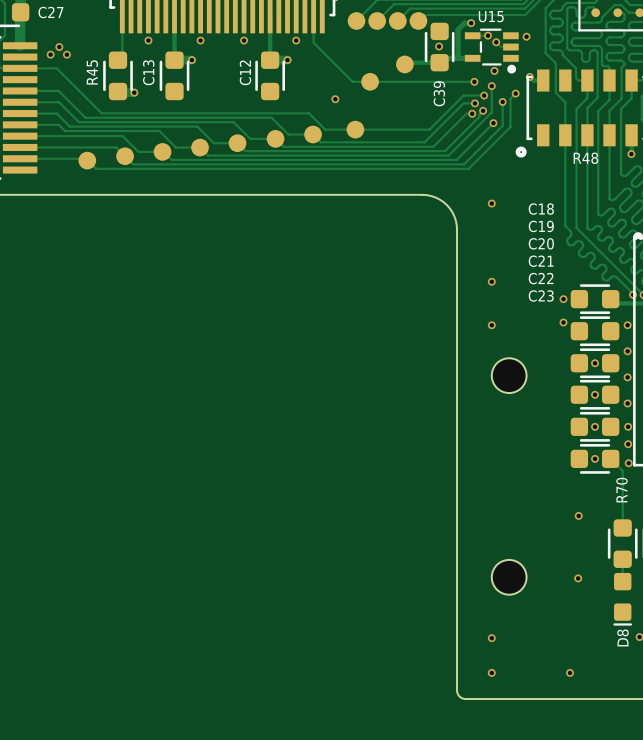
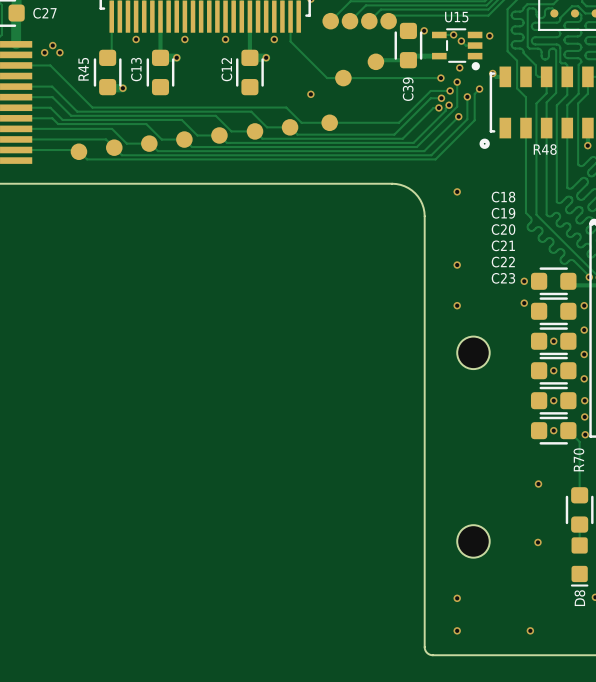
track: (471, 23) (464, 23) (458, 29) (458, 58) -> none
via: (471, 23) -> none
via: none -> (424, 30)
via: (439, 46) -> none

